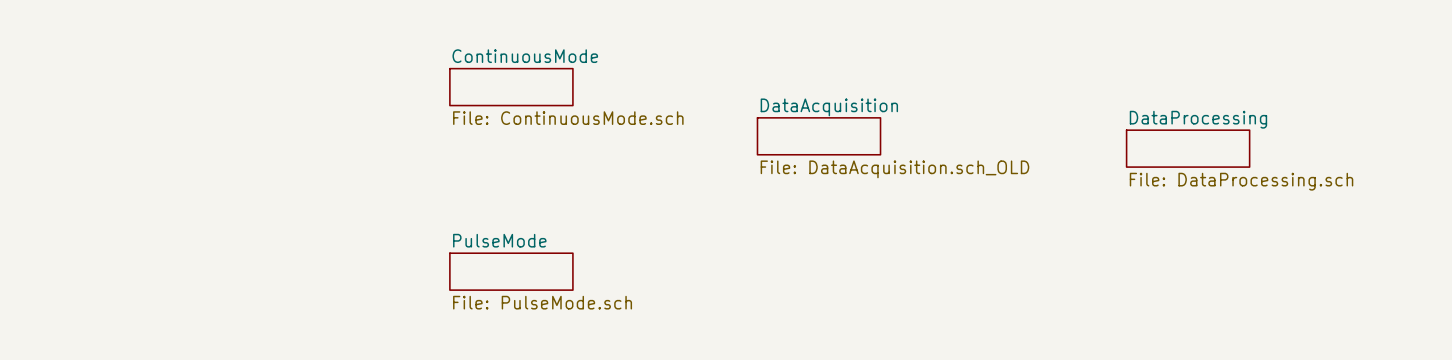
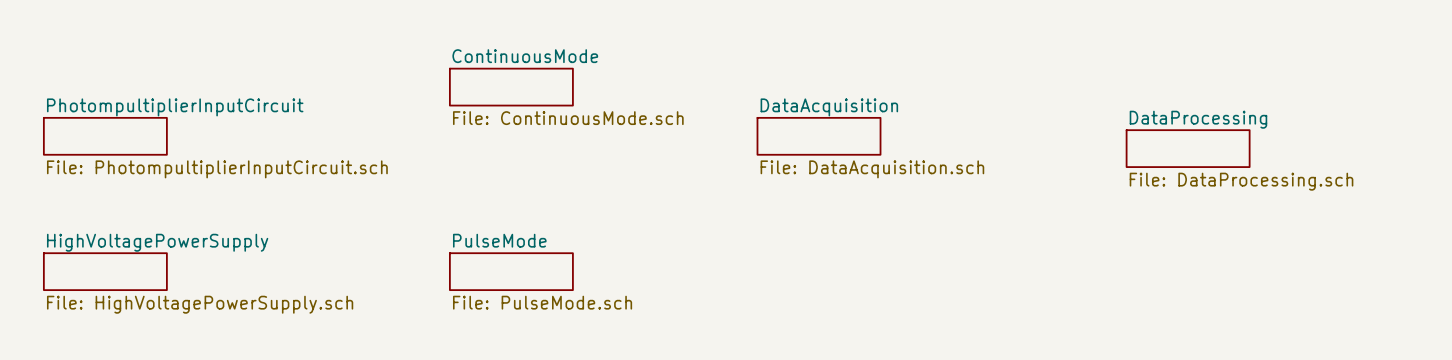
sheet PhotompultiplierInputCircuit: none -> File: PhotompultiplierInputCircuit.sch (105, 136)
sheet DataAcquisition value: File: DataAcquisition.sch_OLD (894, 169) -> File: DataAcquisition.sch (872, 169)
sheet HighVoltagePowerSupply: none -> File: HighVoltagePowerSupply.sch (105, 271)

